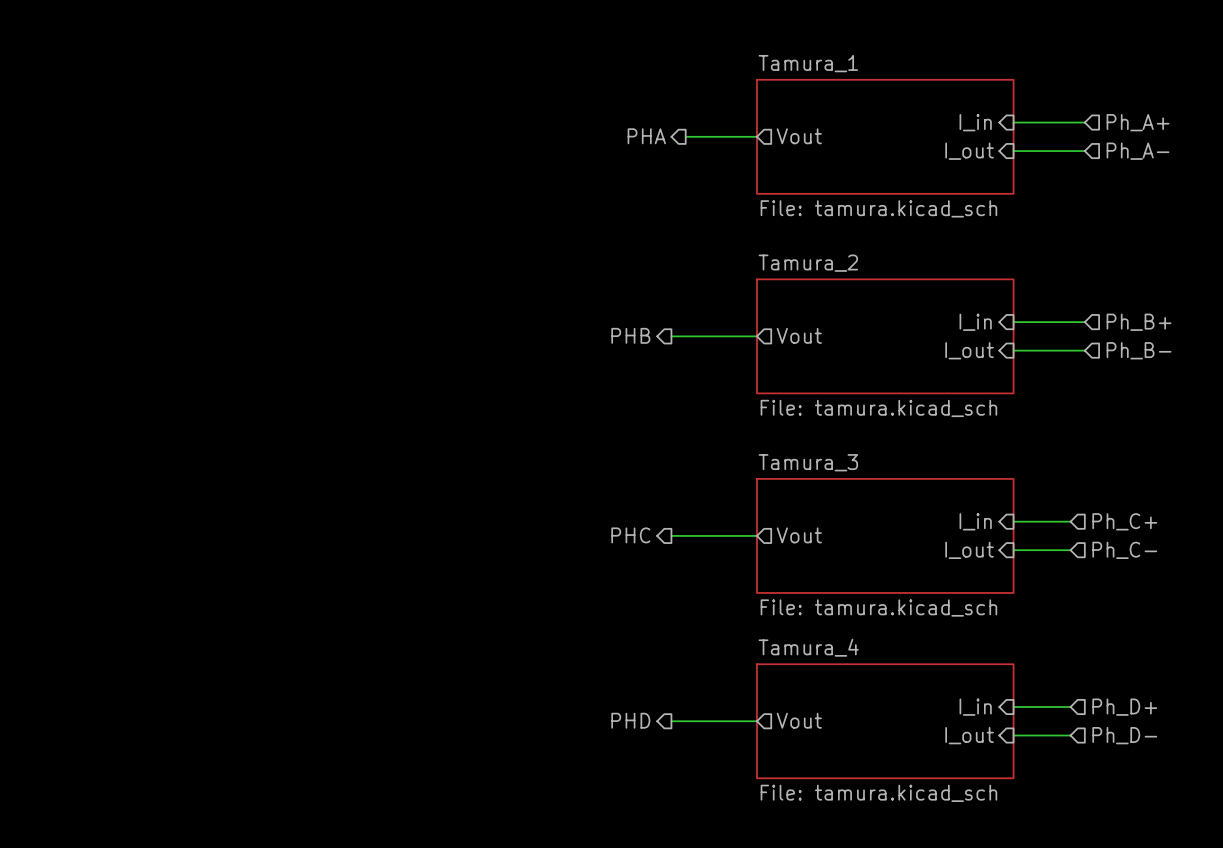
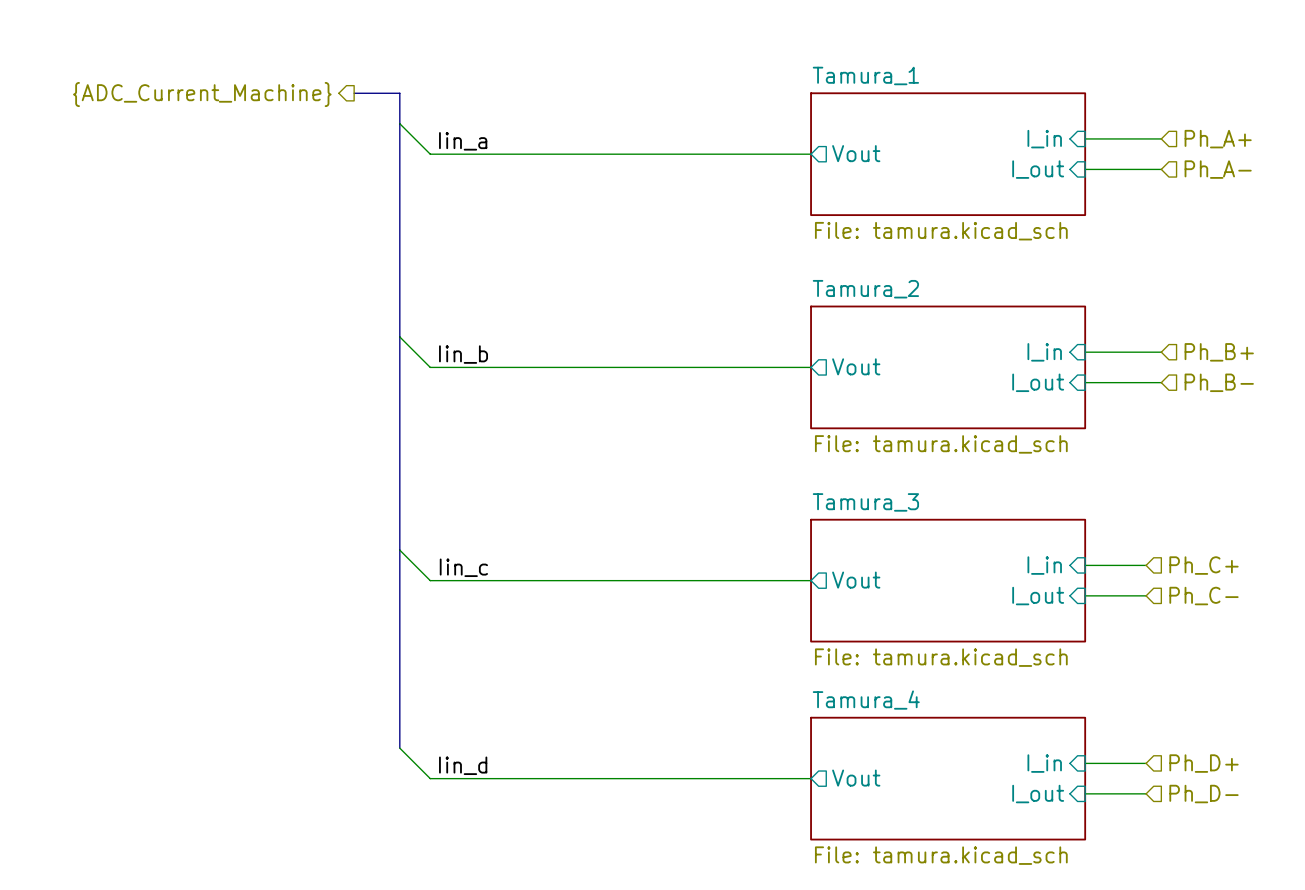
bus: none -> (354, 93) (399, 93) (399, 748)
hierarchical label: none -> {ADC_Current_Machine} (202, 94)
wire: none -> (399, 123) (430, 154) (734, 154)
label: none -> Iin_a (463, 141)
hierarchical label: PHA (646, 136) -> none
wire: none -> (399, 336) (430, 367) (719, 367)
label: none -> Iin_b (463, 354)
hierarchical label: PHB (630, 335) -> none
wire: none -> (399, 550) (430, 580) (719, 580)
label: none -> Iin_c (463, 567)
hierarchical label: PHC (630, 535) -> none
wire: none -> (399, 748) (430, 778) (719, 778)
label: none -> Iin_d (463, 765)
hierarchical label: PHD (630, 720) -> none

